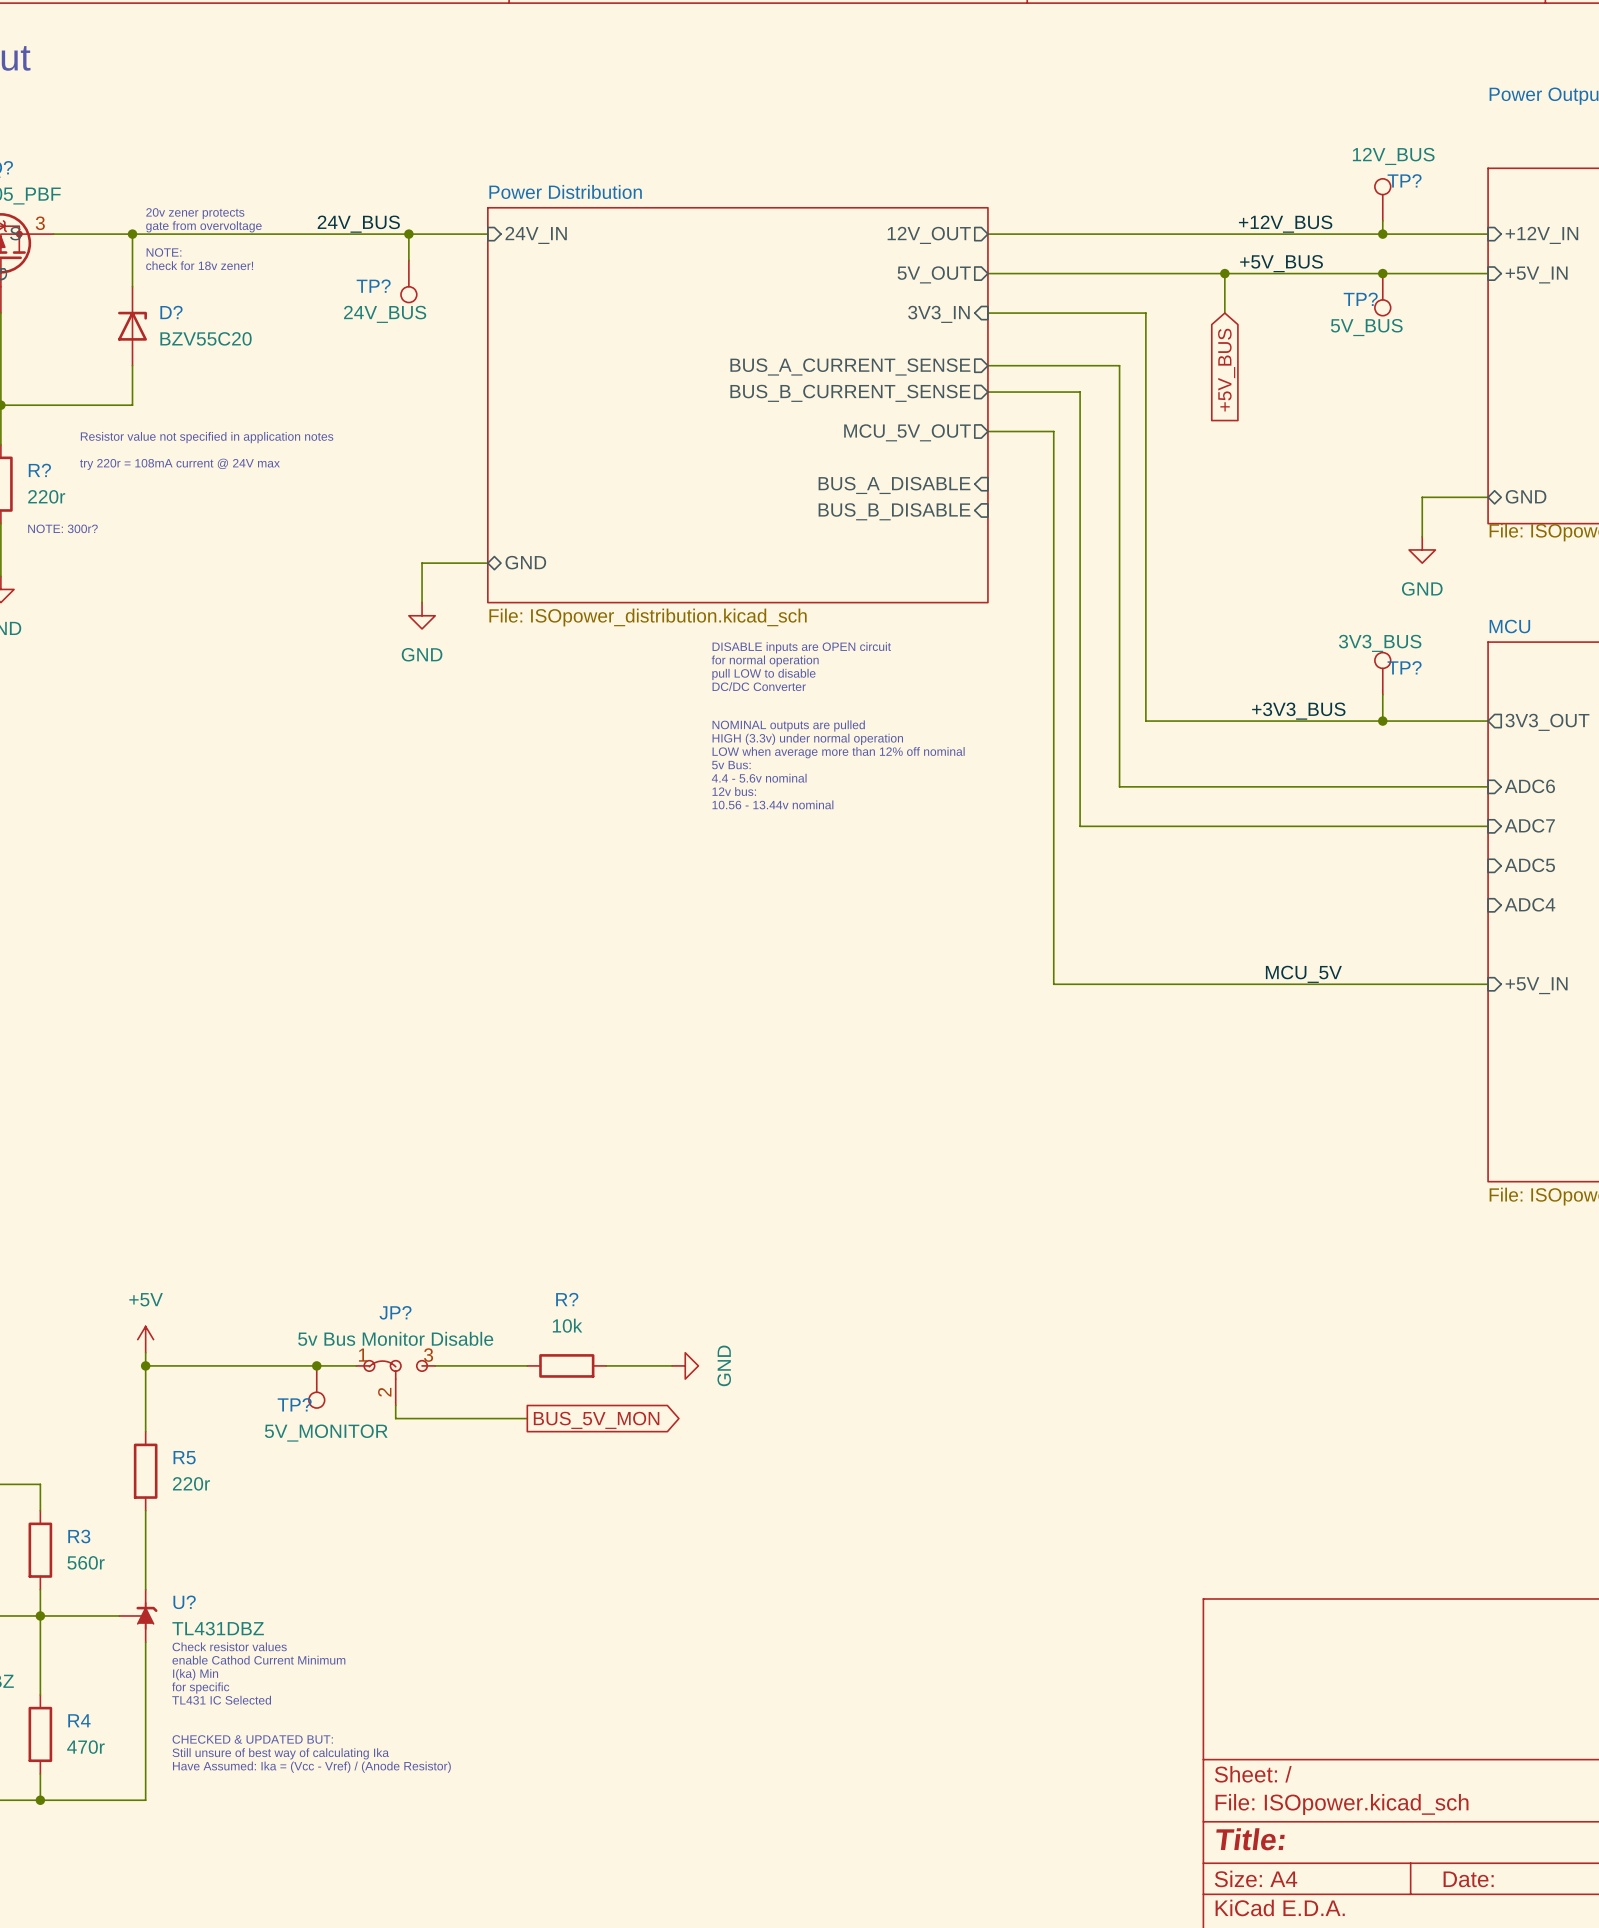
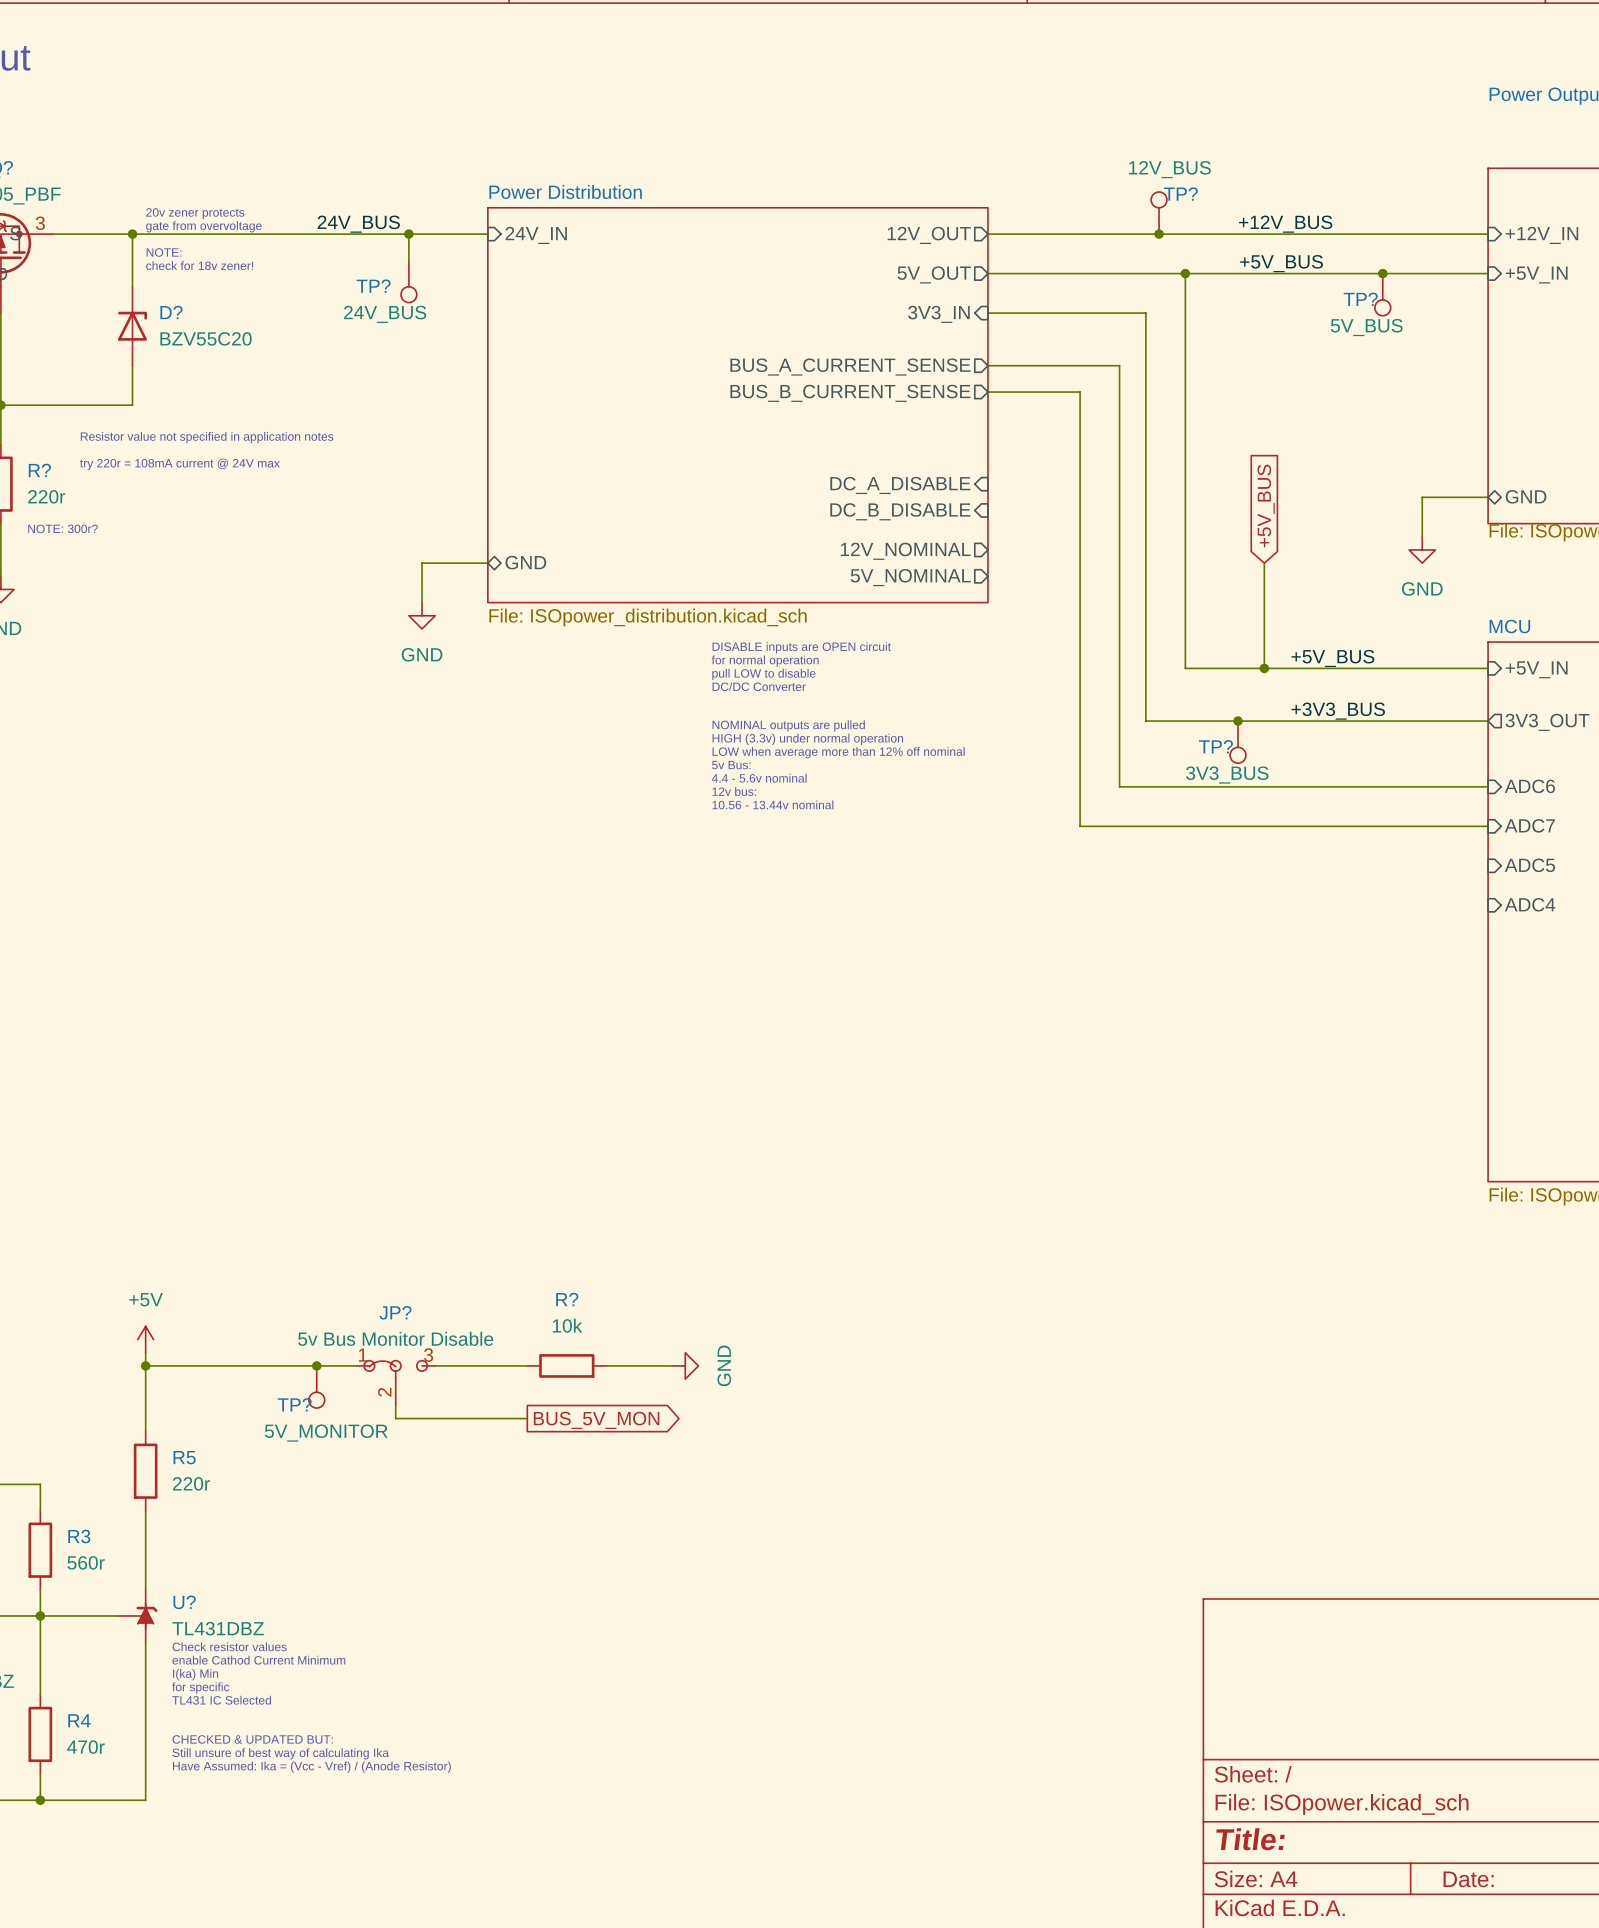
TP? position: (1382, 199) -> (1159, 213)
wire: (1382, 220) (1382, 234) -> none
junction: none -> (1159, 234)
junction: (1382, 234) -> none
wire: none -> (1185, 273) (1185, 668) (1488, 668)
junction: none -> (1185, 273)
wire: (1224, 273) (1224, 313) -> none
junction: (1224, 273) -> none
global label rotation: 0° (1226, 370) -> 180° (1266, 506)
wire: (987, 431) (1053, 431) (1053, 984) (1488, 984) -> none
sheet pin: MCU_5V_OUT (907, 432) -> none
sheet pin: BUS_A_DISABLE (894, 485) -> DC_A_DISABLE (900, 485)
sheet pin: BUS_B_DISABLE (894, 511) -> DC_B_DISABLE (900, 511)
sheet pin: none -> 12V_NOMINAL (905, 551)
wire: none -> (1264, 563) (1264, 668)
sheet pin: none -> 5V_NOMINAL (910, 577)
label: none -> +5V_BUS (1332, 658)
TP? rotation: 0° (1382, 660) -> 180° (1238, 755)
junction: none -> (1264, 668)
sheet pin: none -> +5V_IN (1536, 669)
TP? position: (1382, 673) -> (1238, 742)
wire: (1382, 694) (1382, 721) -> none
label position: +3V3_BUS (1298, 711) -> +3V3_BUS (1338, 711)
junction: none -> (1238, 721)
junction: (1382, 721) -> none
label: MCU_5V (1303, 974) -> none
sheet pin: +5V_IN (1536, 985) -> none

